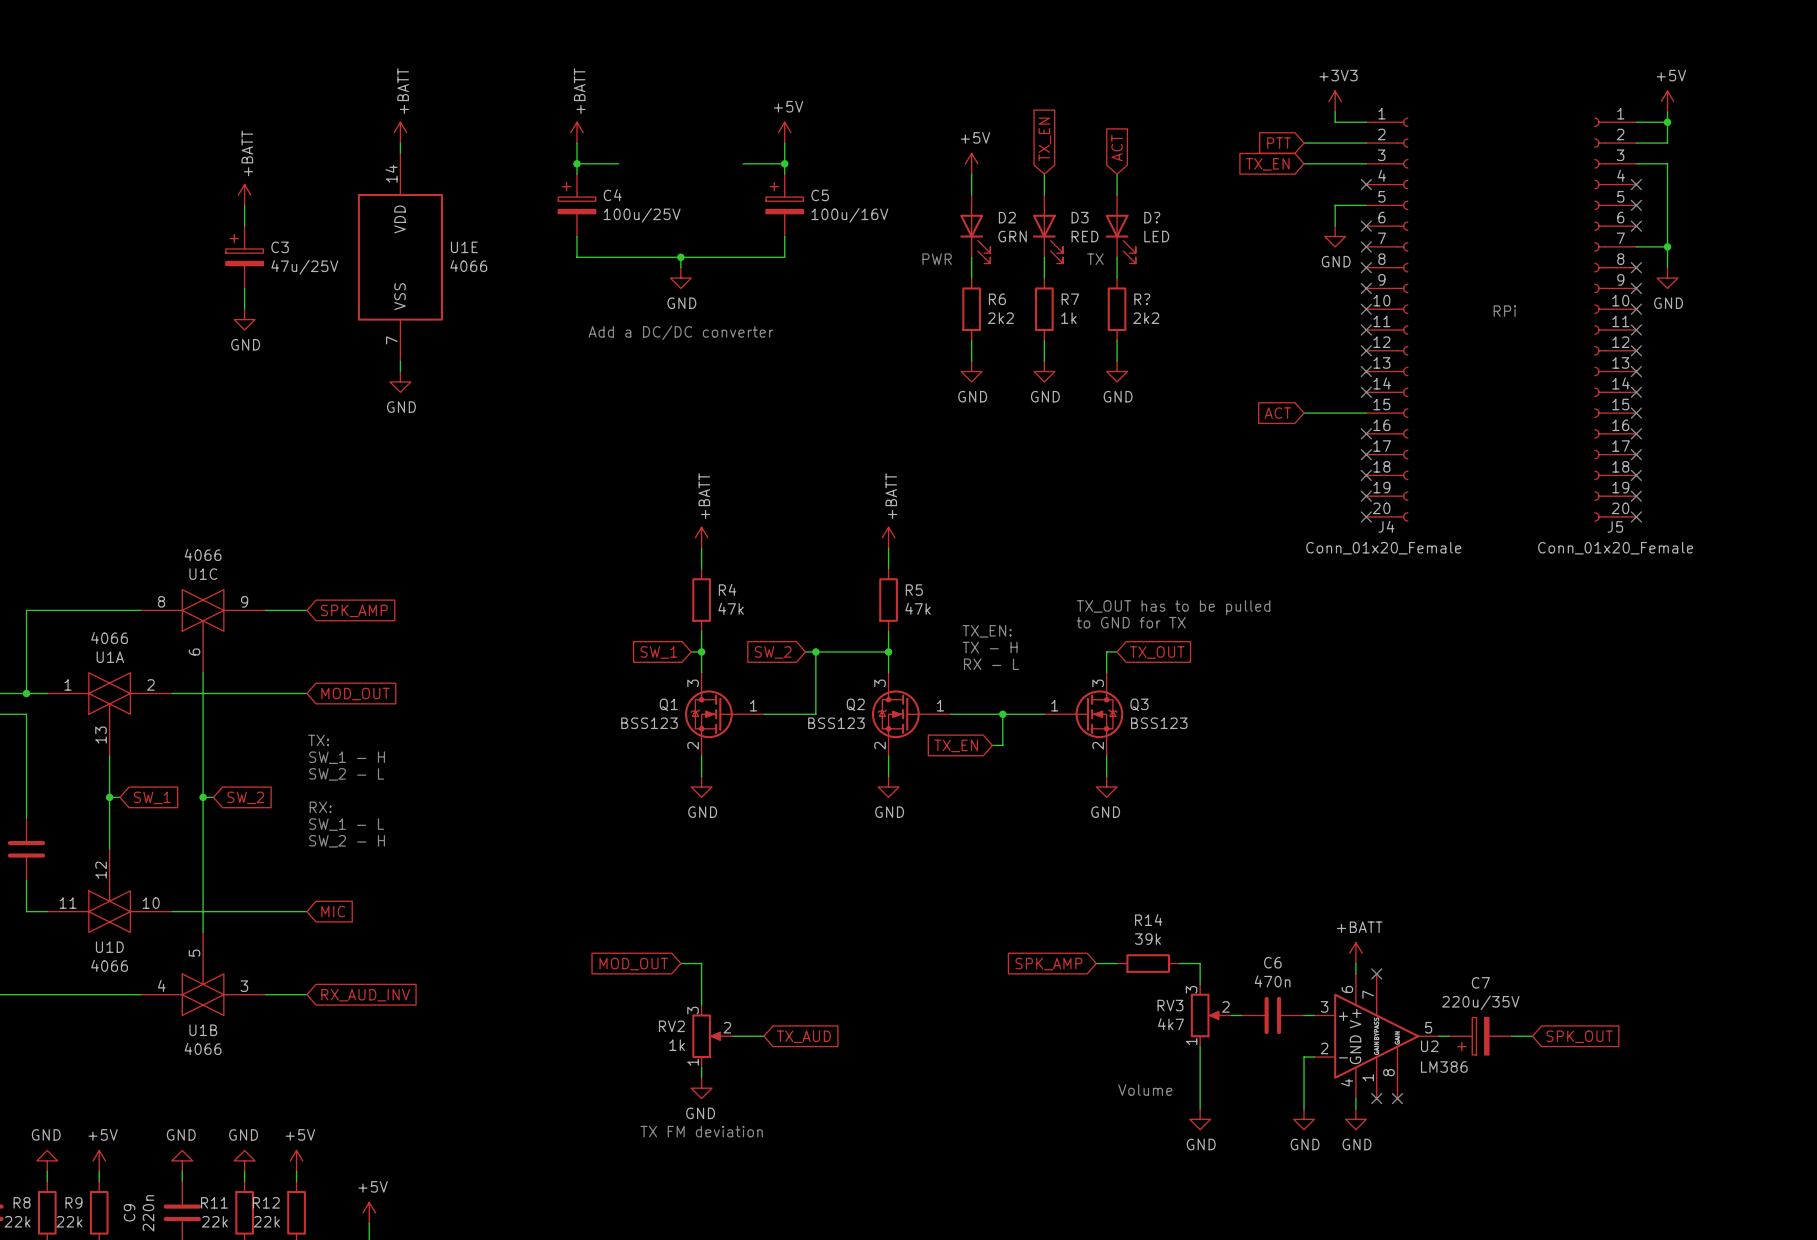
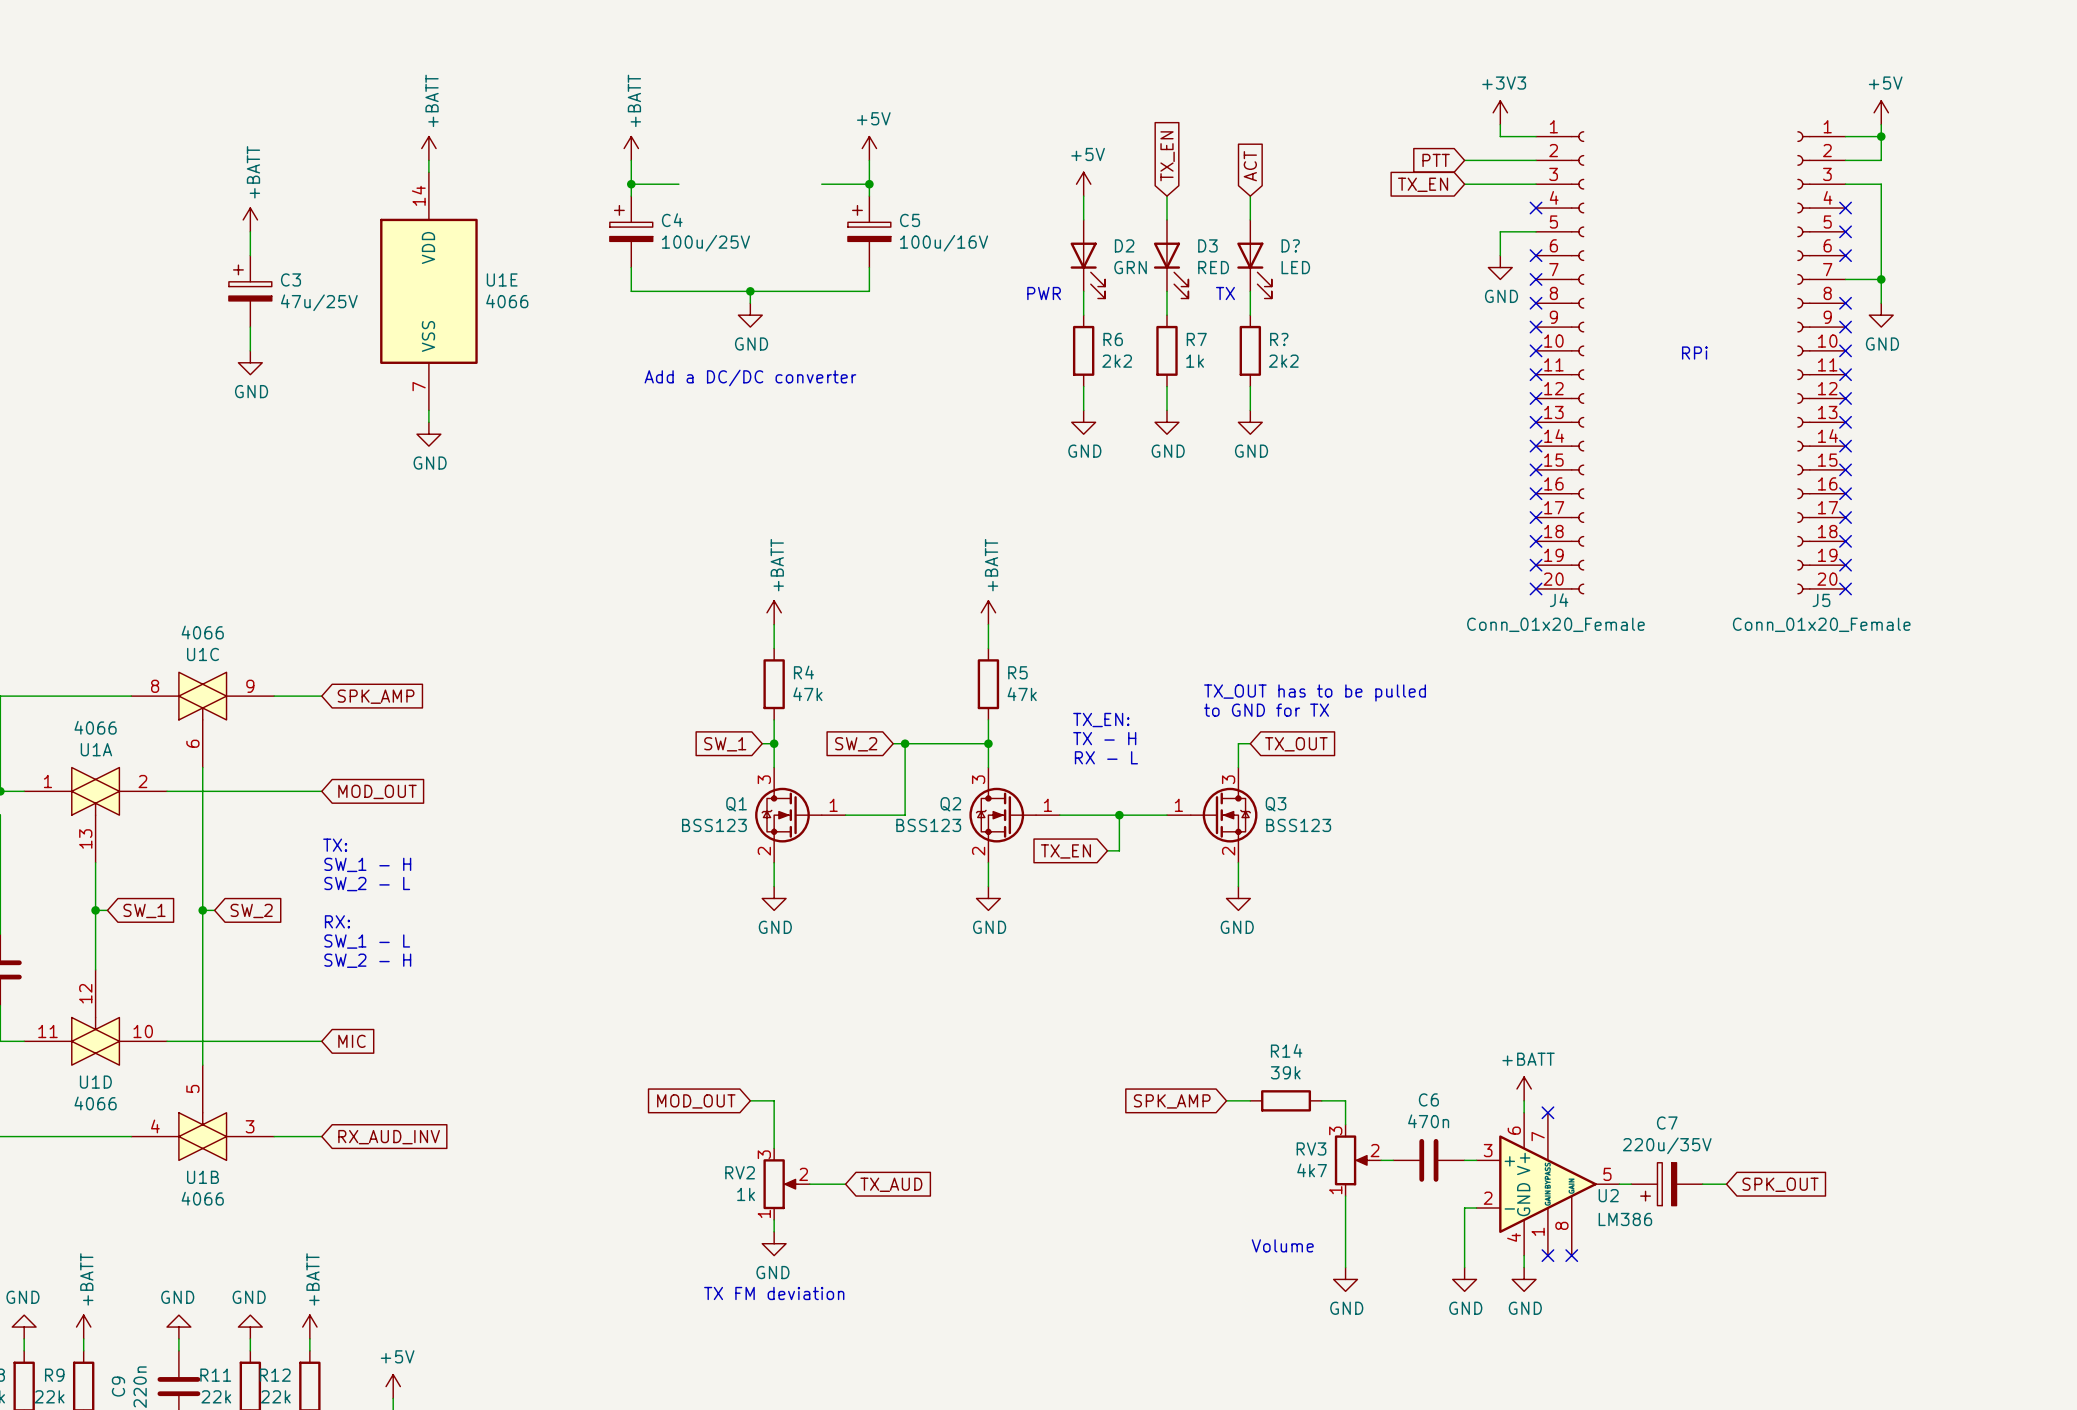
global label: ACT (1277, 413) -> none
wire: (1304, 413) (1366, 413) -> none
no-connect mark: none -> (1536, 469)
power symbol: +5V (99, 1160) -> +BATT (83, 1327)
power symbol: +5V (296, 1160) -> +BATT (309, 1327)

